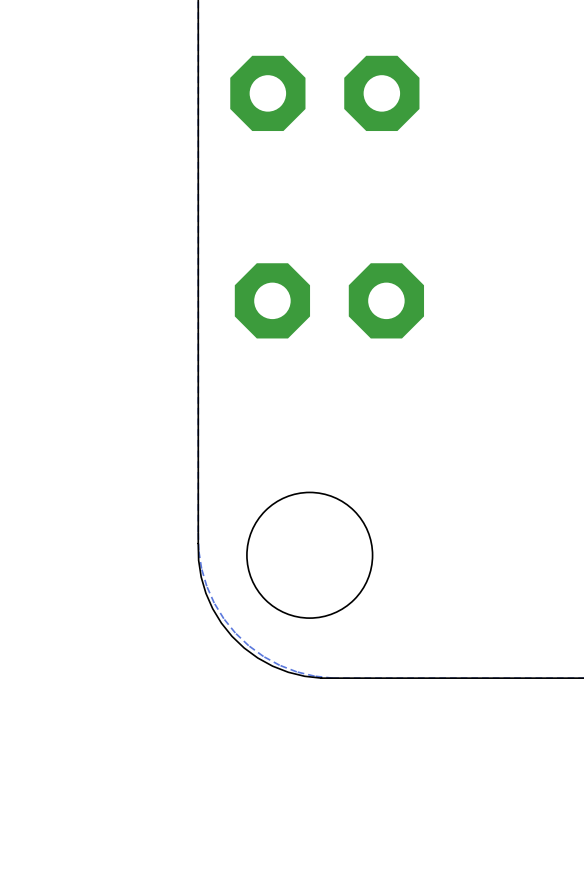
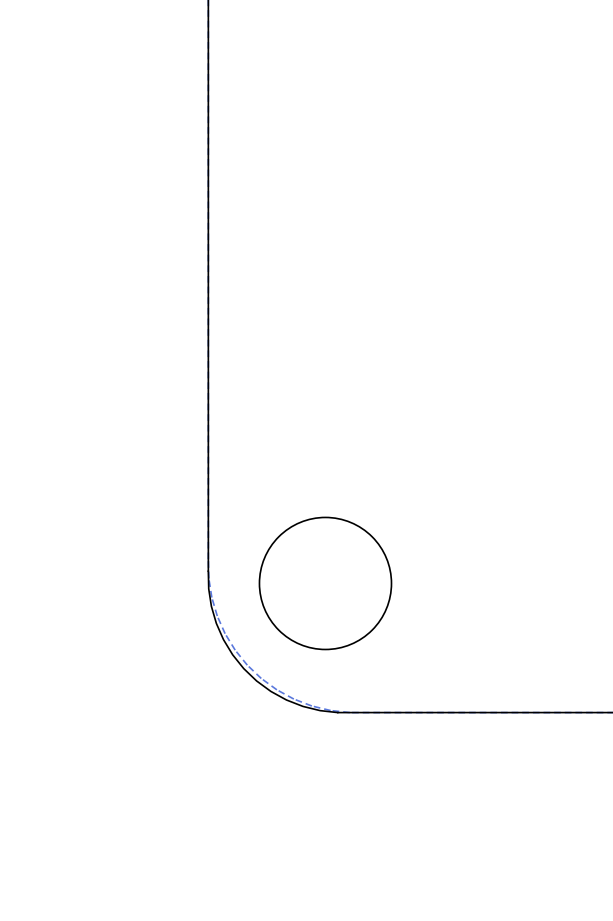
part: (324, 93) -> none
part: (329, 300) -> none

